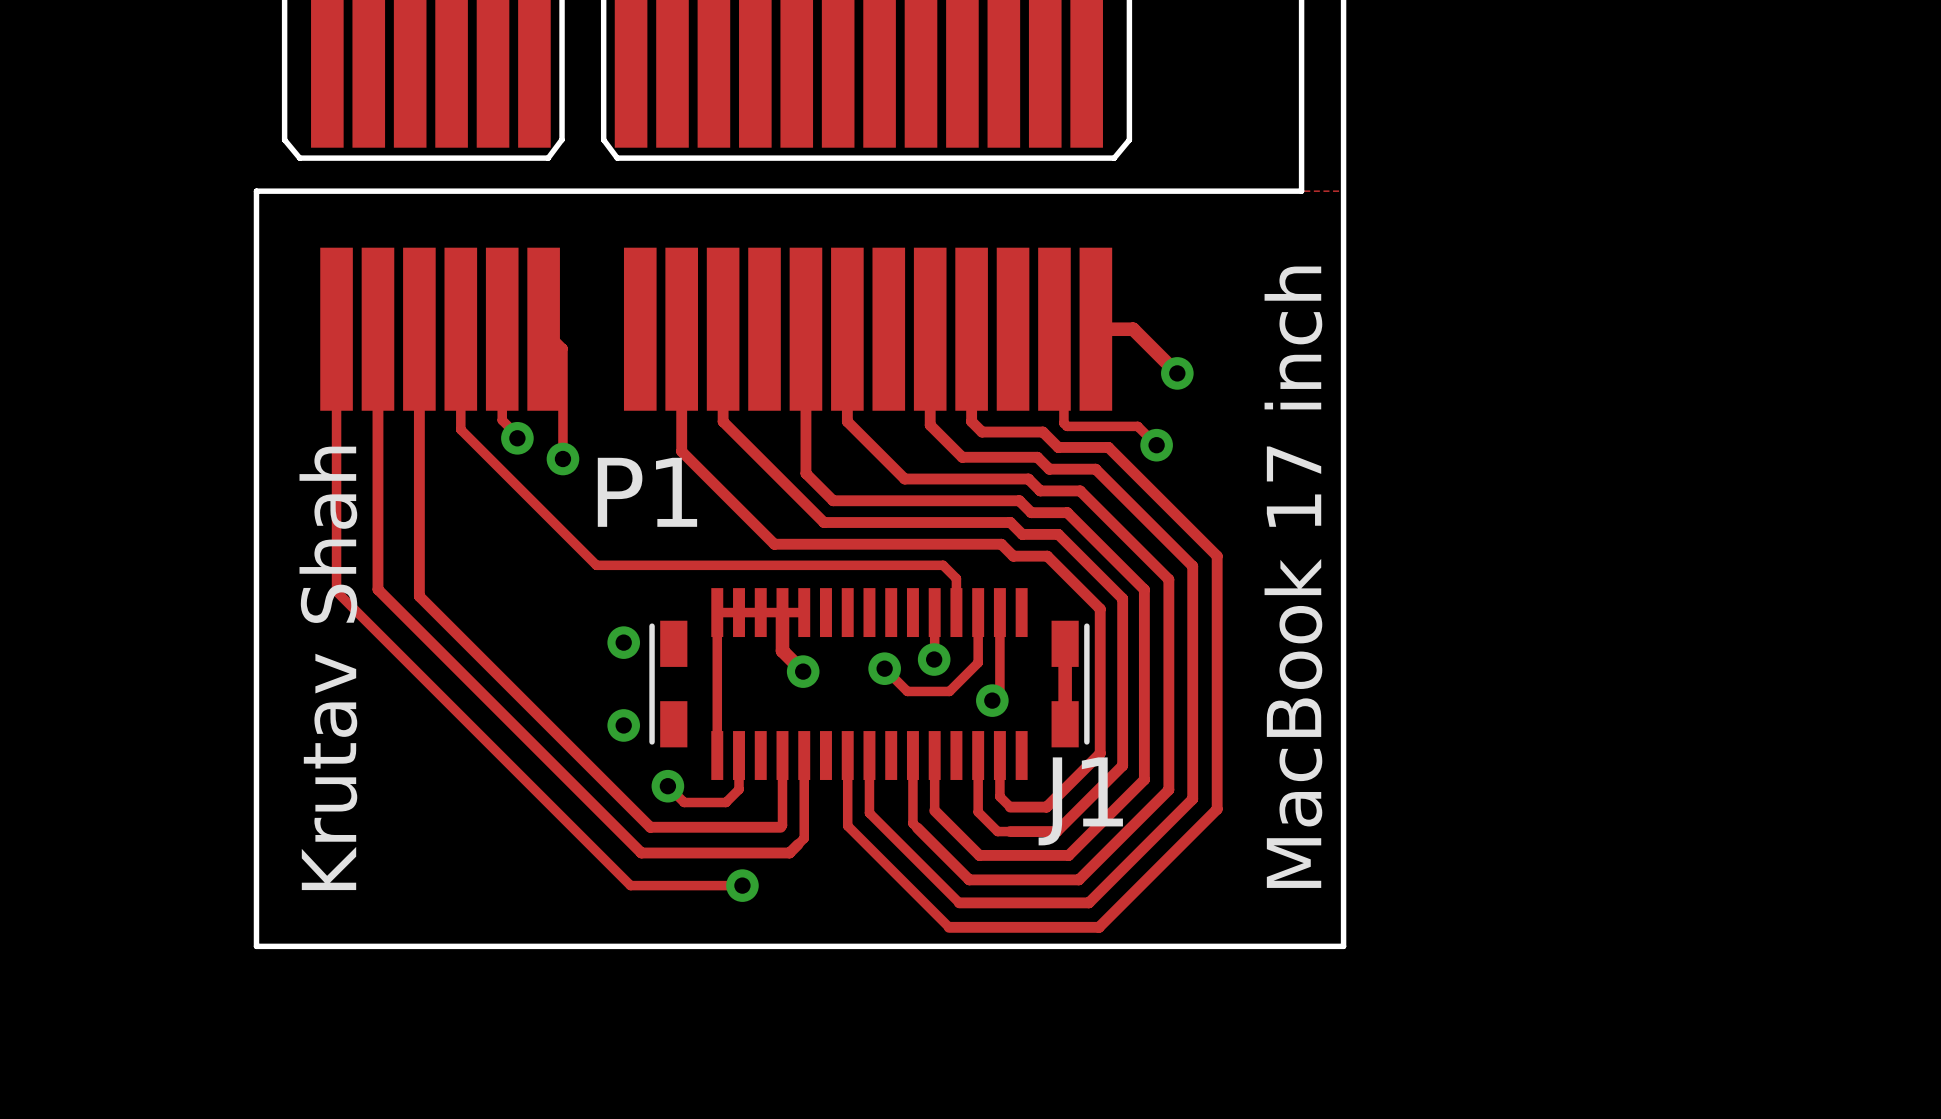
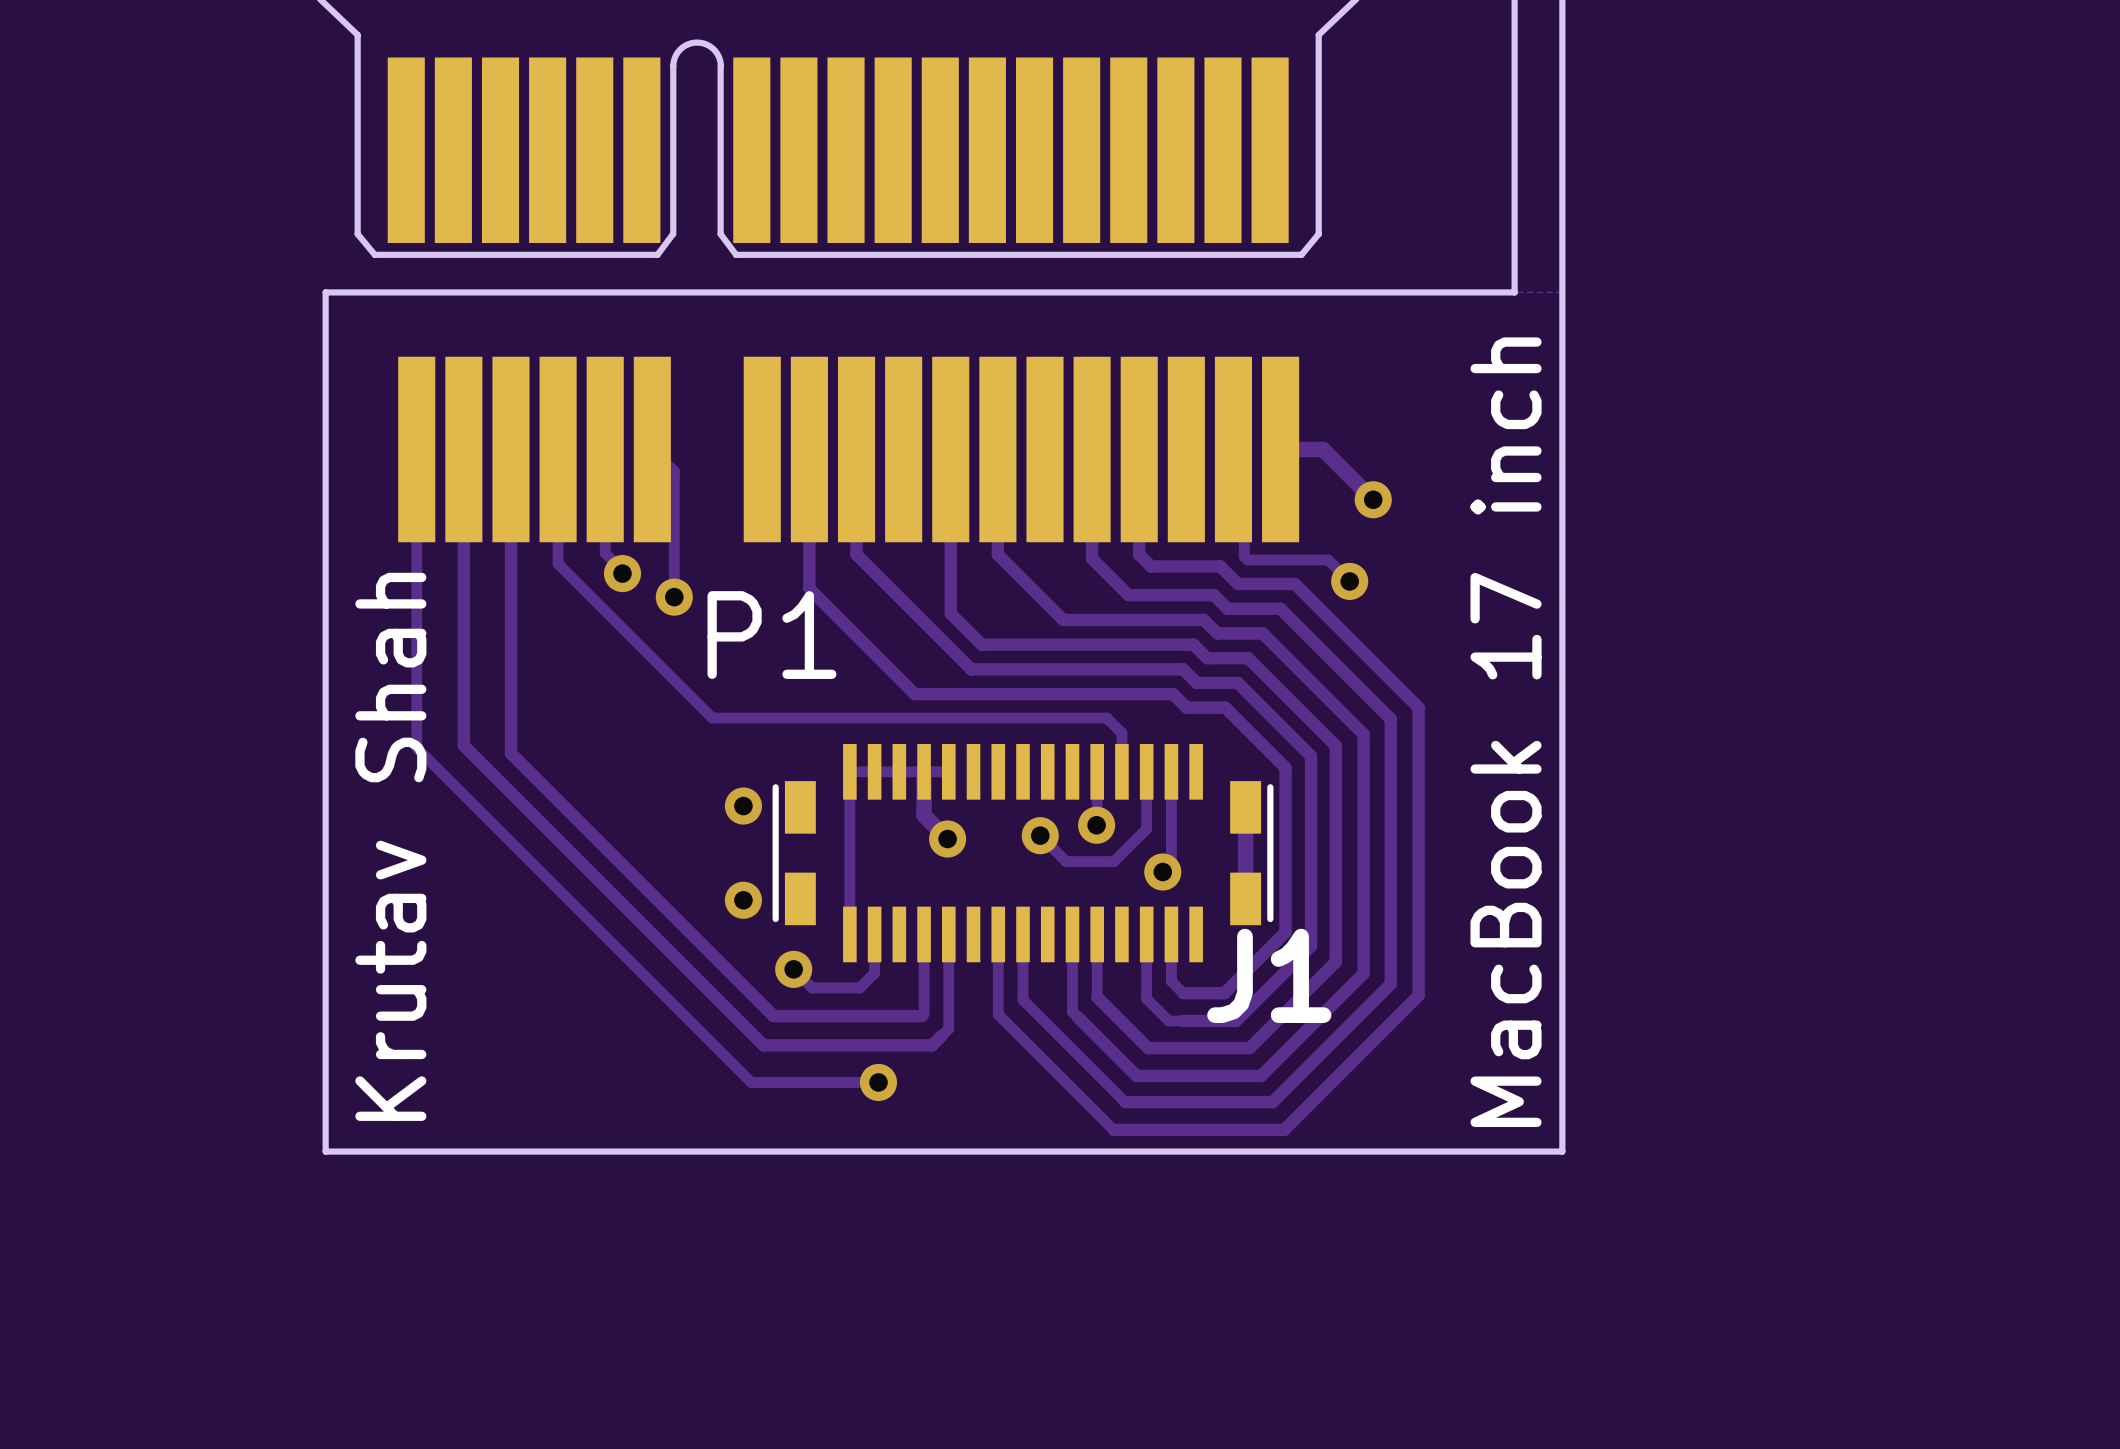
text position: Krutav Shah (328, 668) -> Krutav Shah (390, 846)

